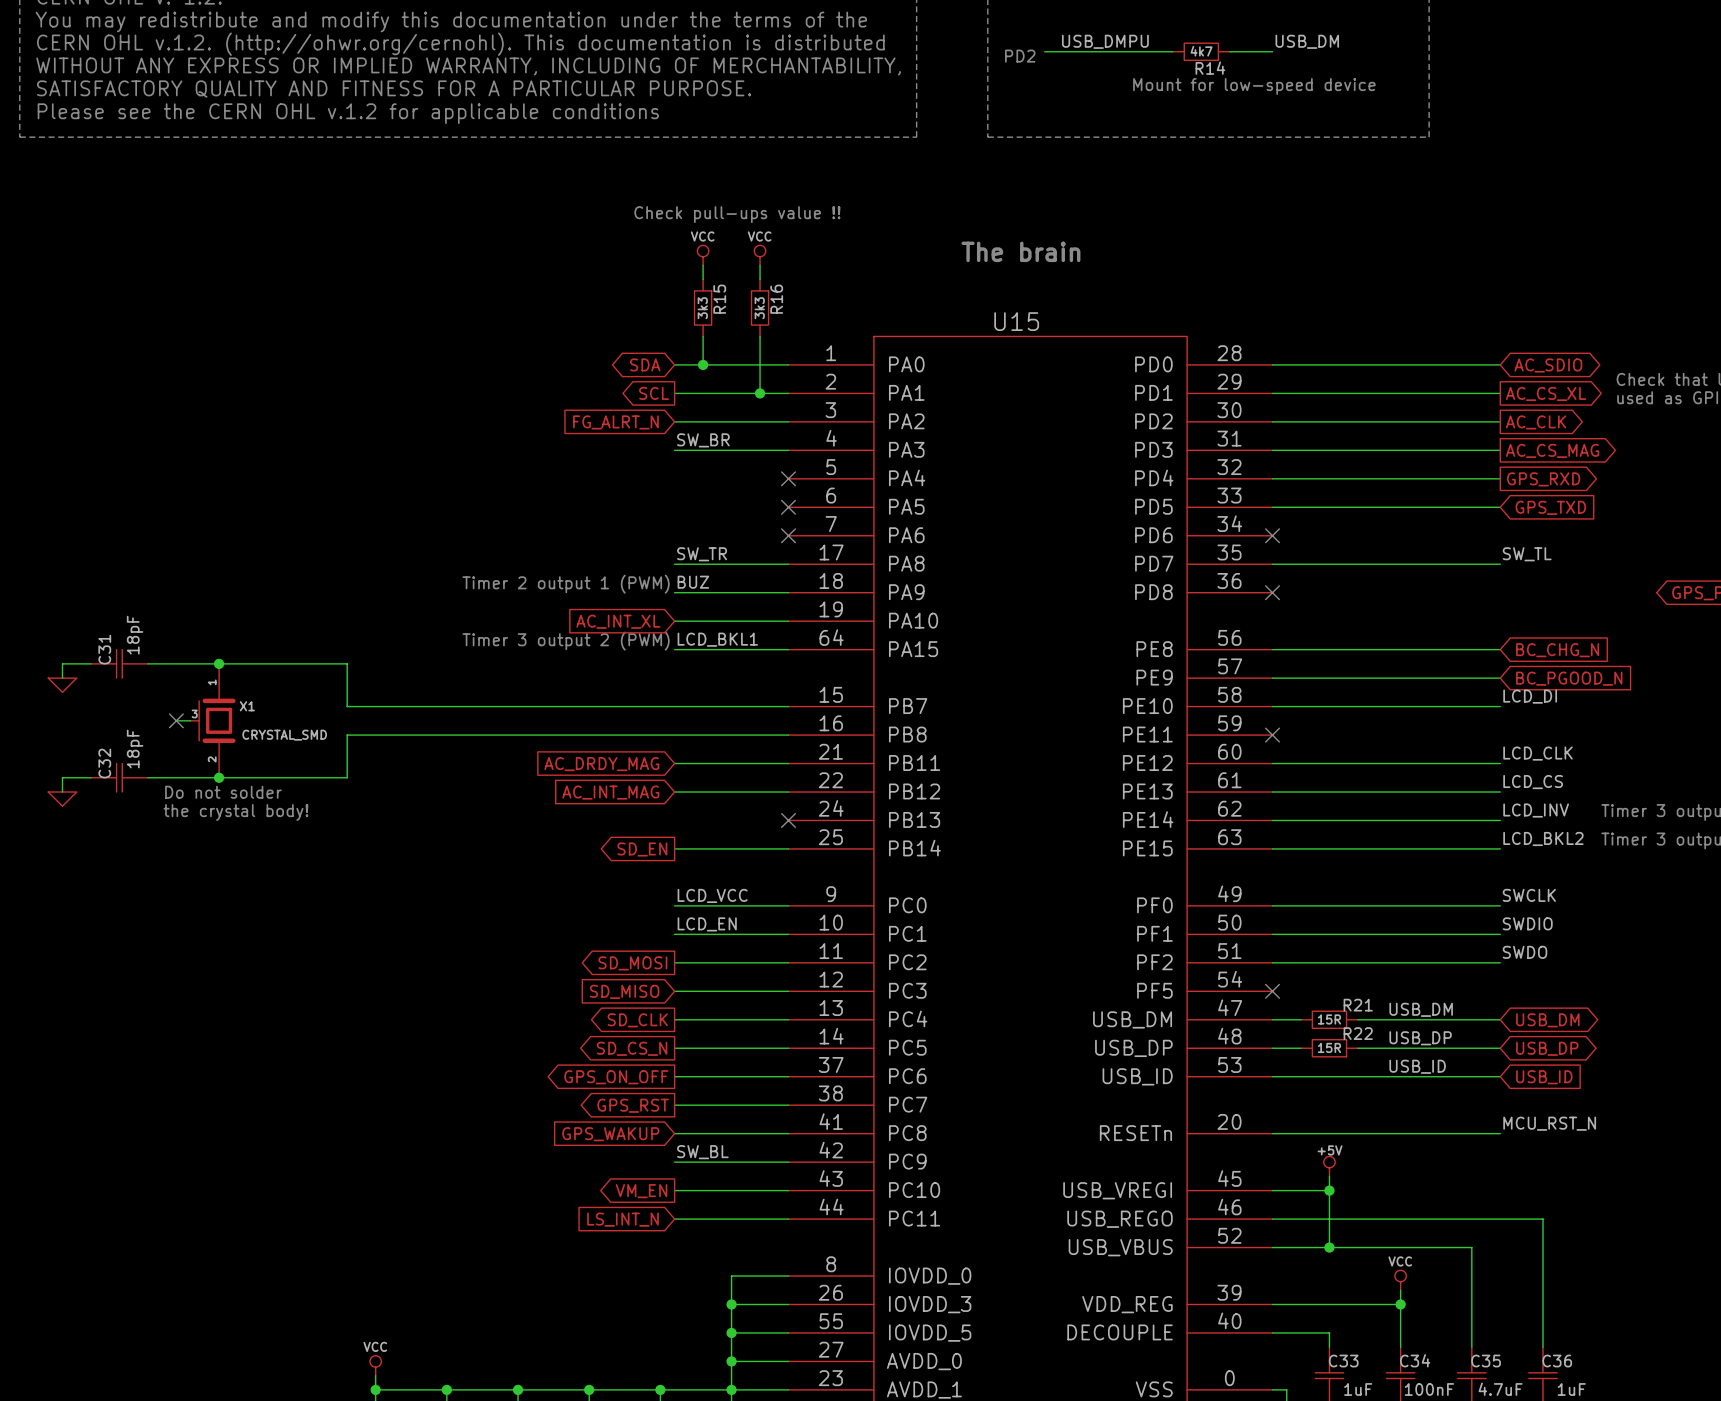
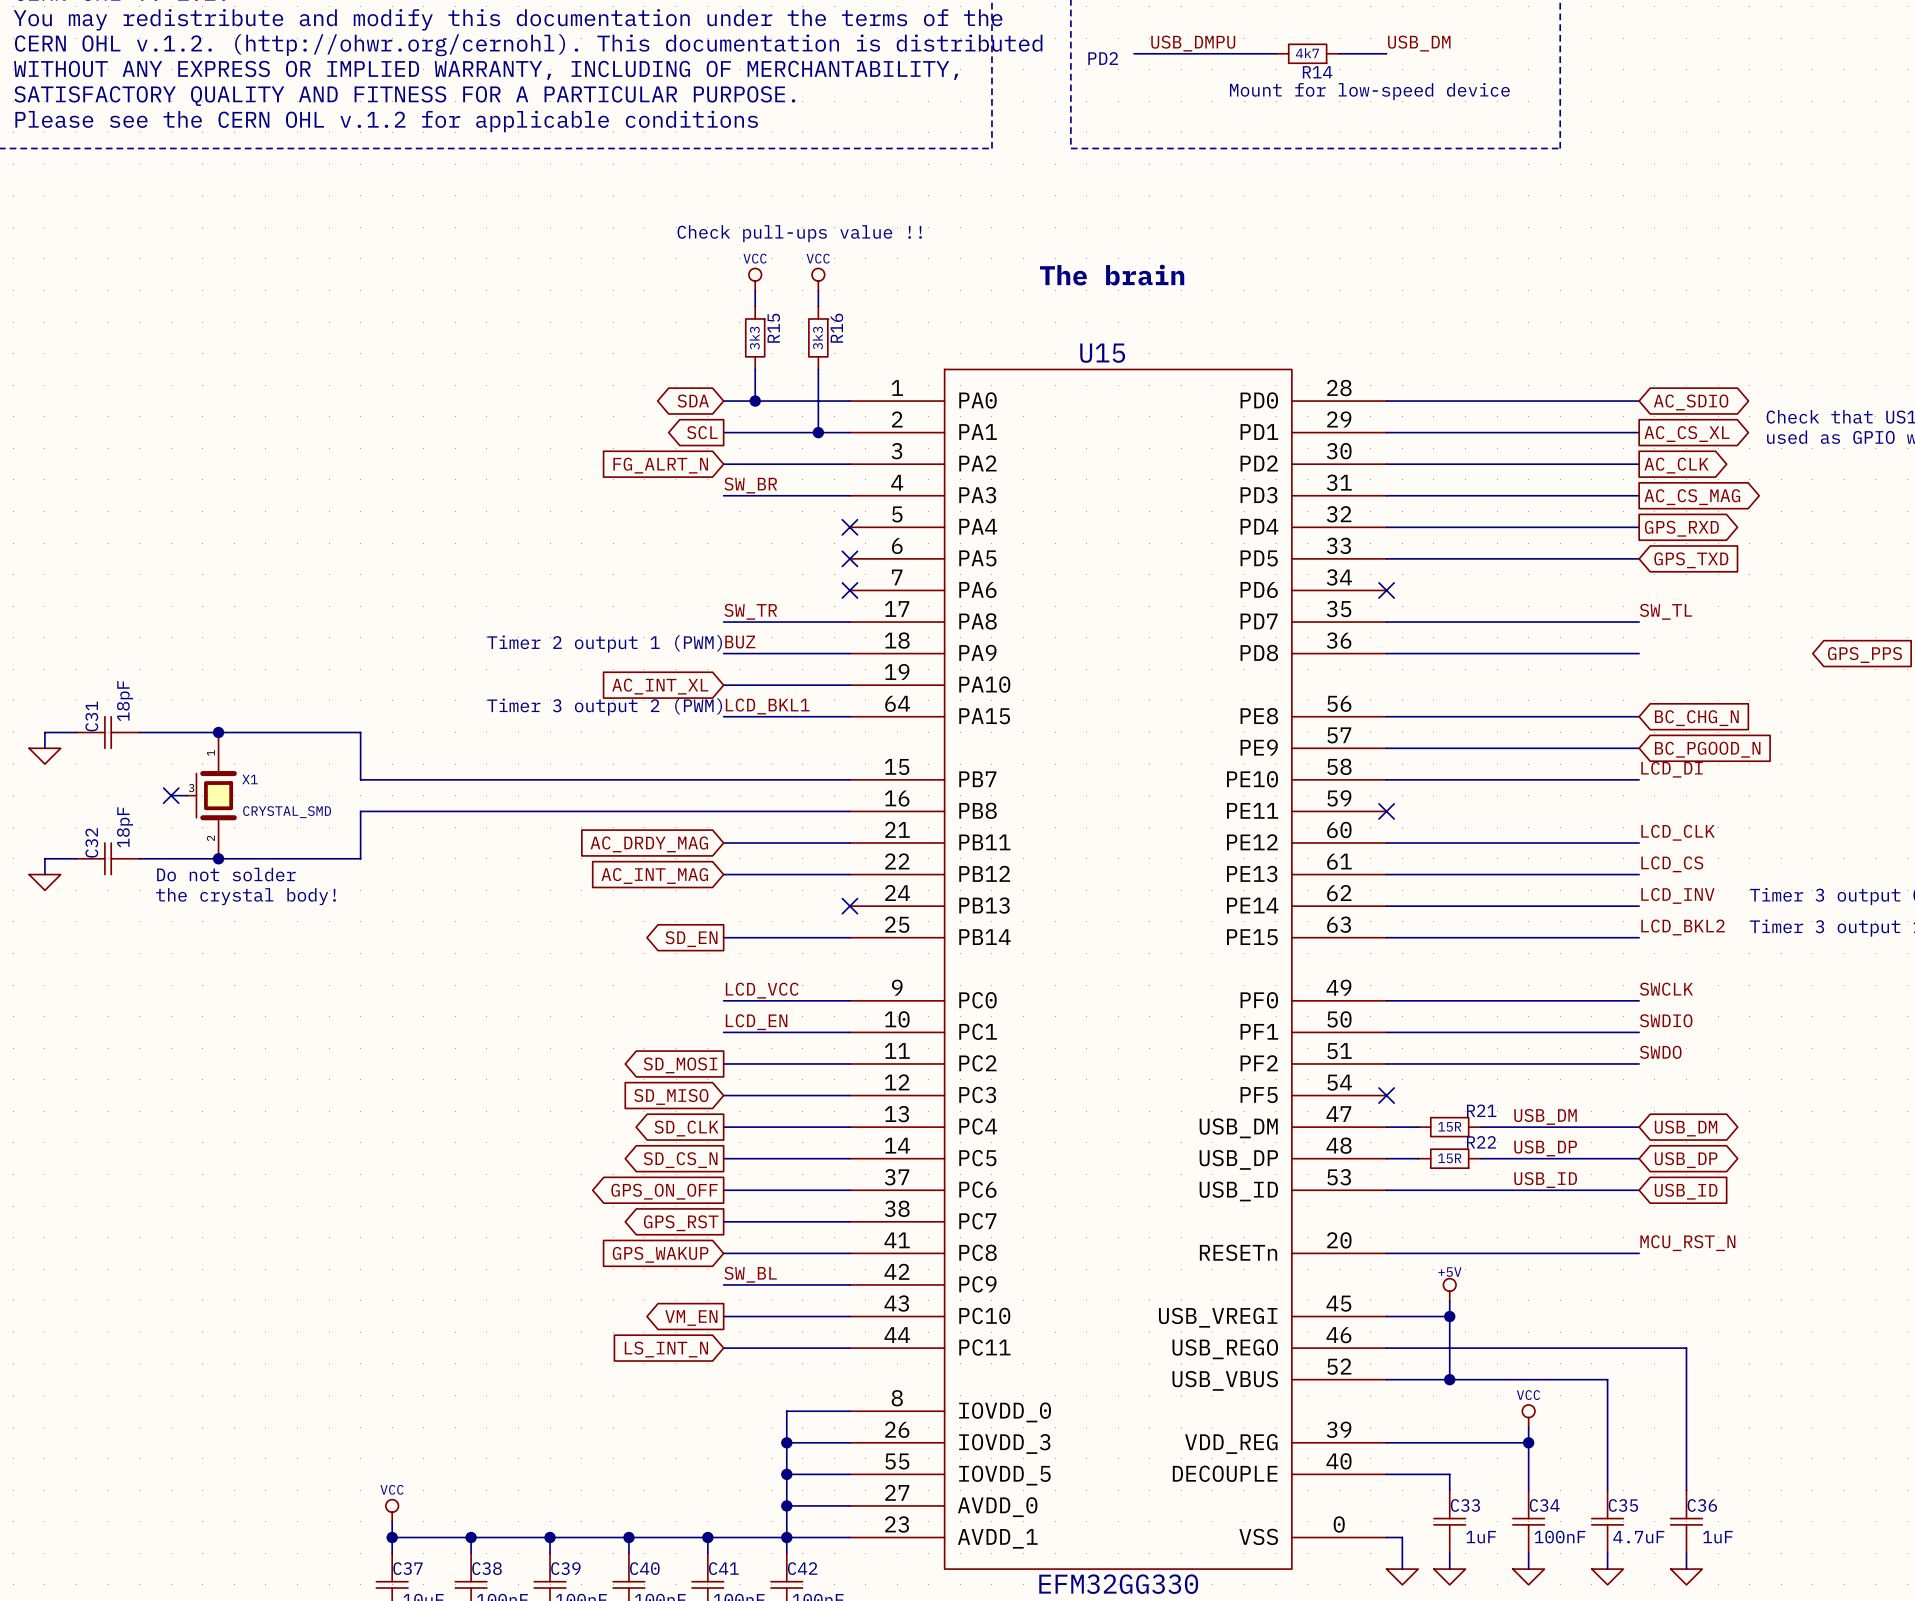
wire: none -> (1386, 653) (1639, 653)
no-connect mark: (1272, 592) -> none

